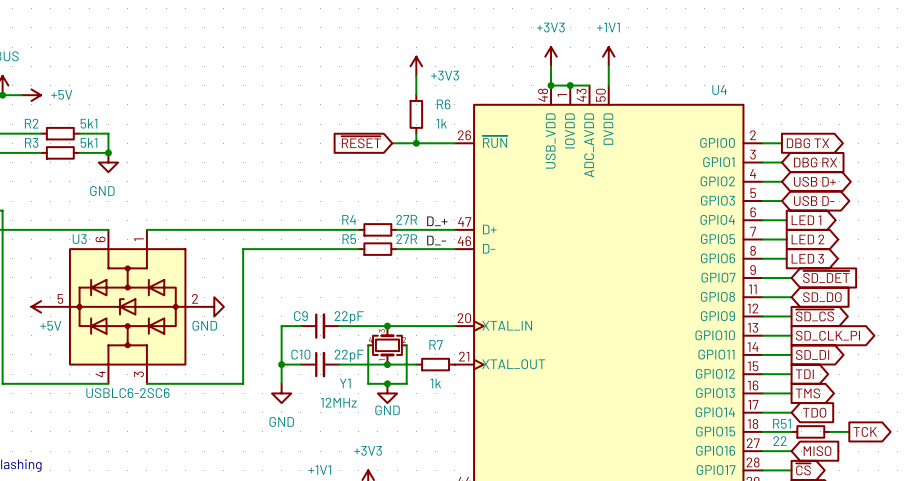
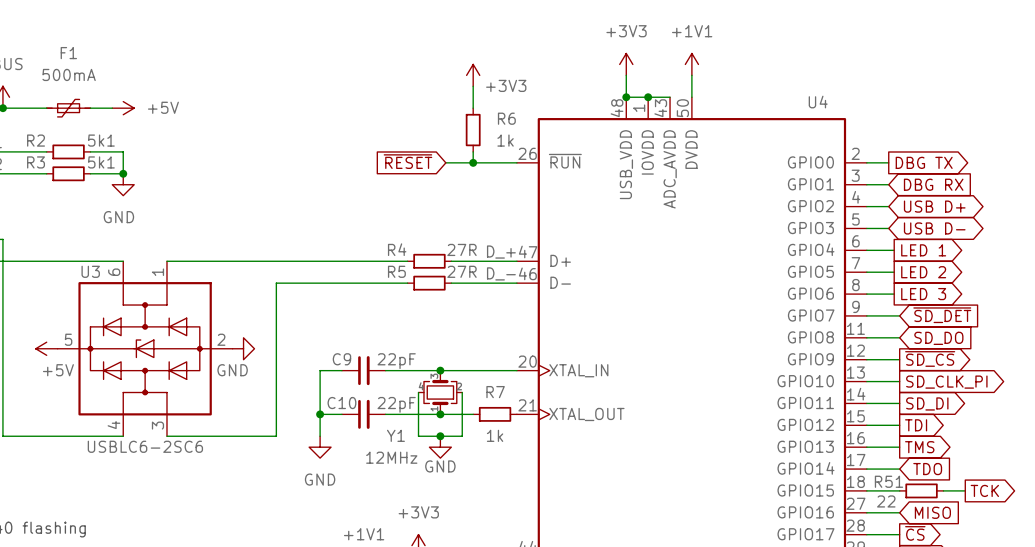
power symbol position: +5V (31, 95) -> +5V (123, 108)
F1: none -> 500mA (68, 108)
wire: none -> (90, 108) (112, 108)

